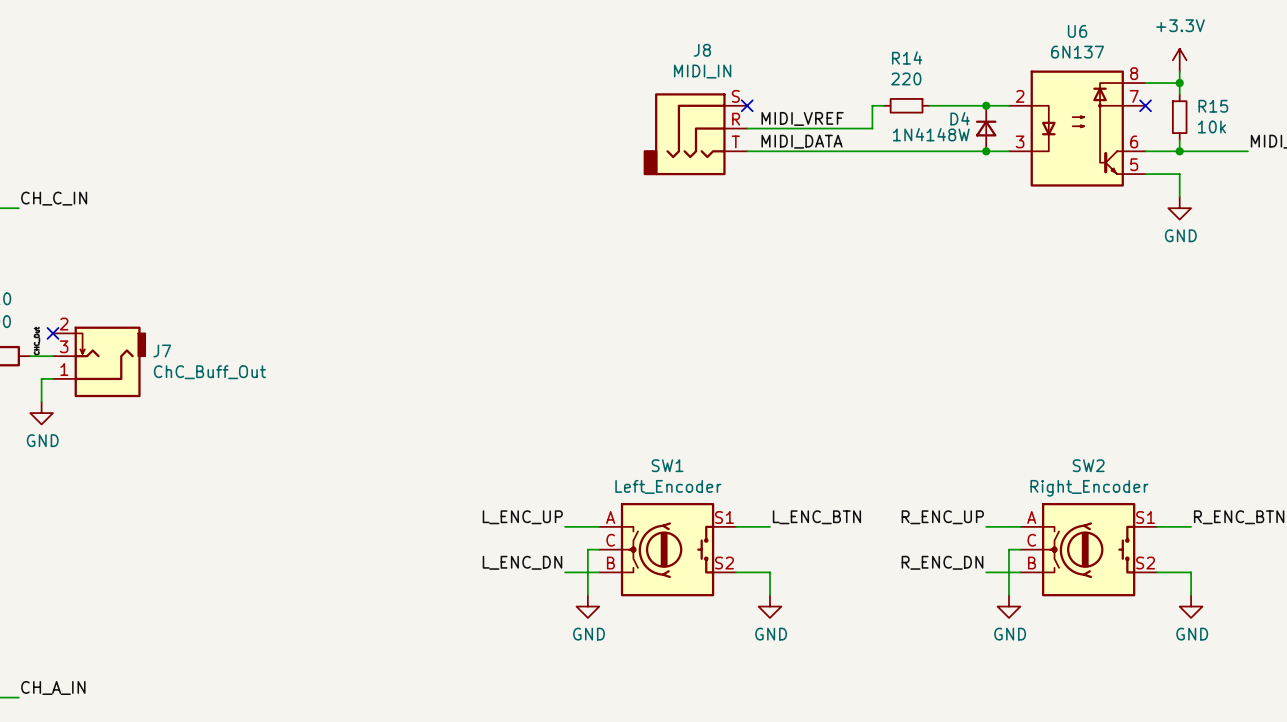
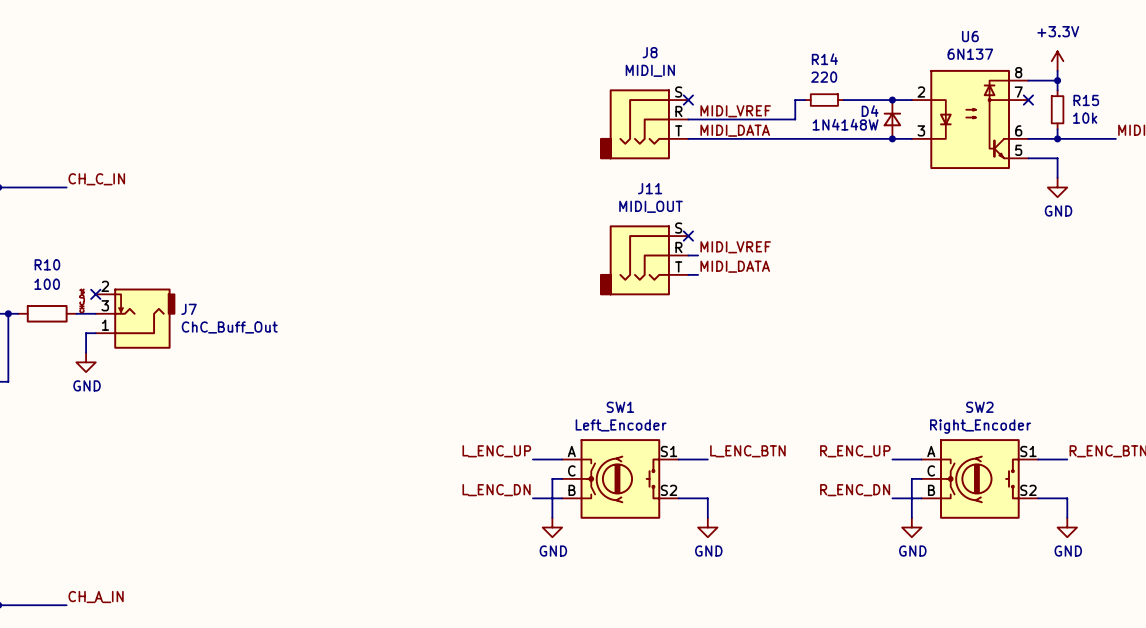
no-connect mark: none -> (688, 236)
label: none -> MIDI_VREF (735, 247)
wire: none -> (688, 255) (698, 255)
J11: none -> MIDI_OUT (644, 260)
label: none -> MIDI_DATA (735, 266)
wire: none -> (688, 274) (698, 274)

